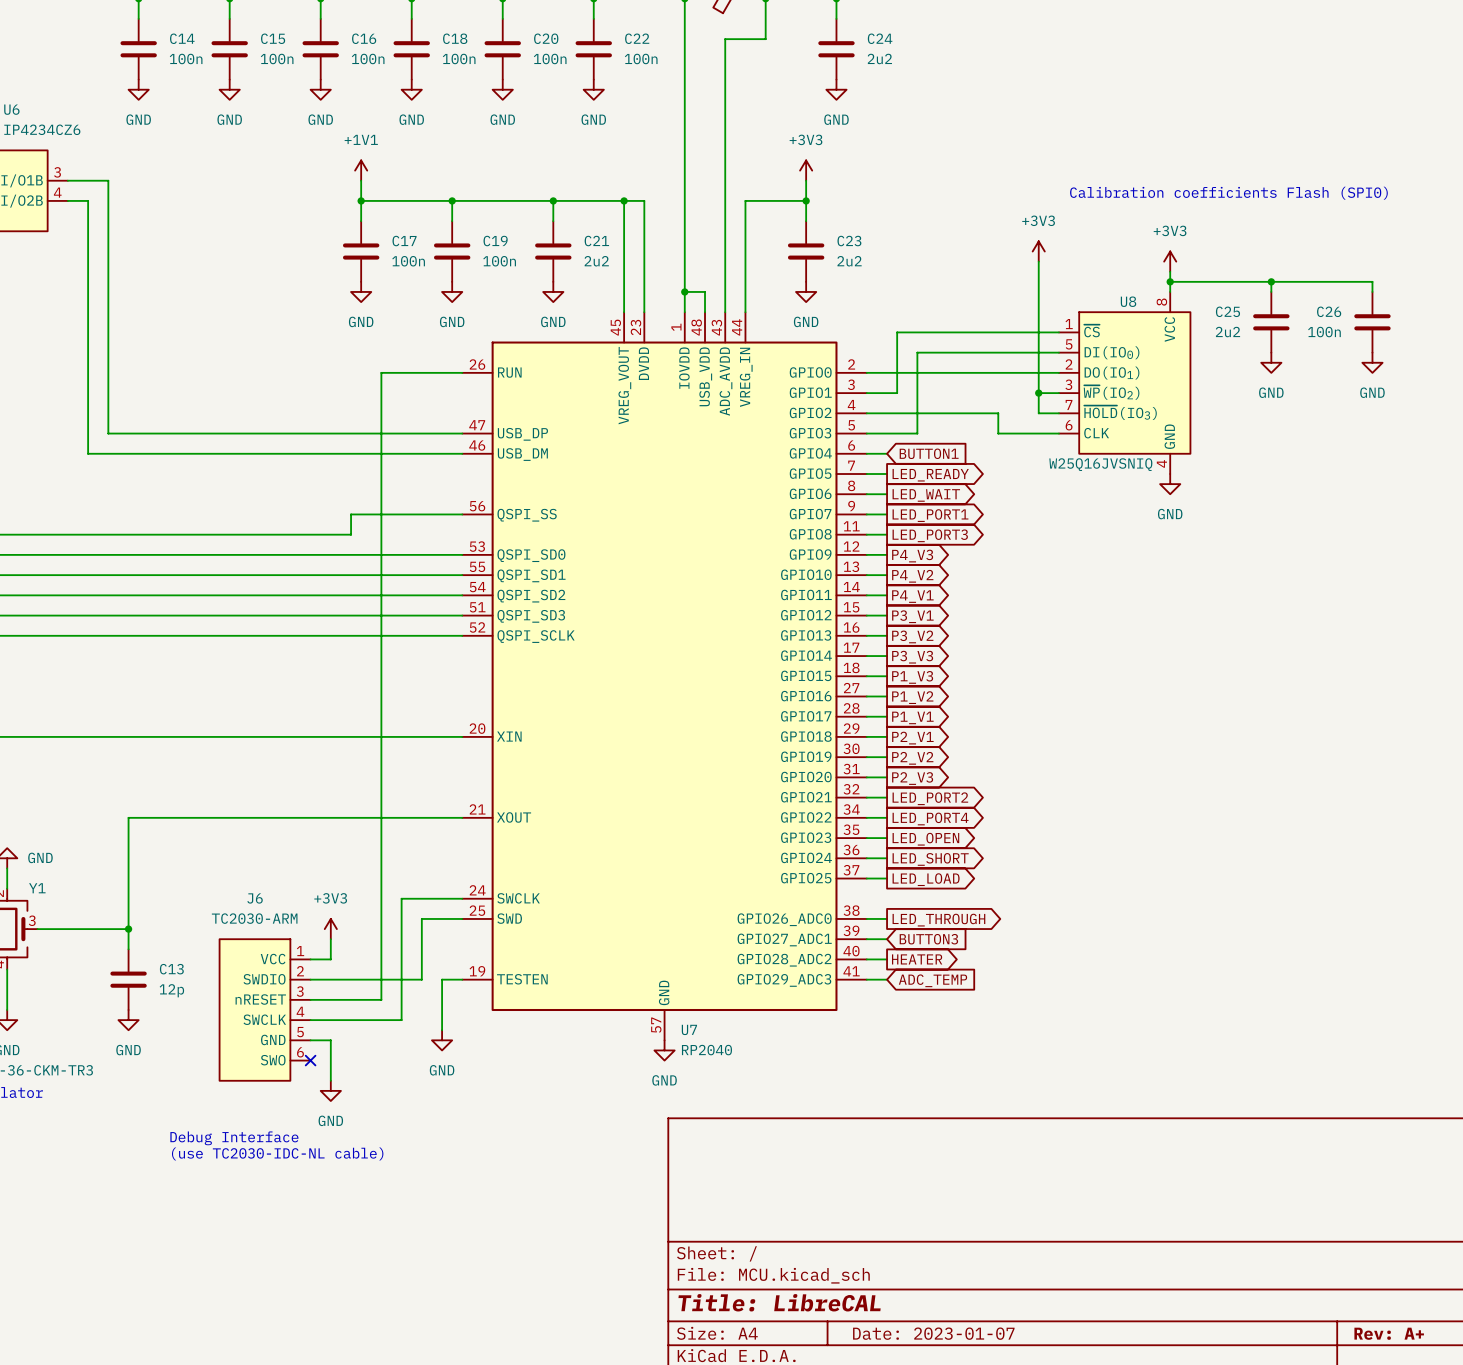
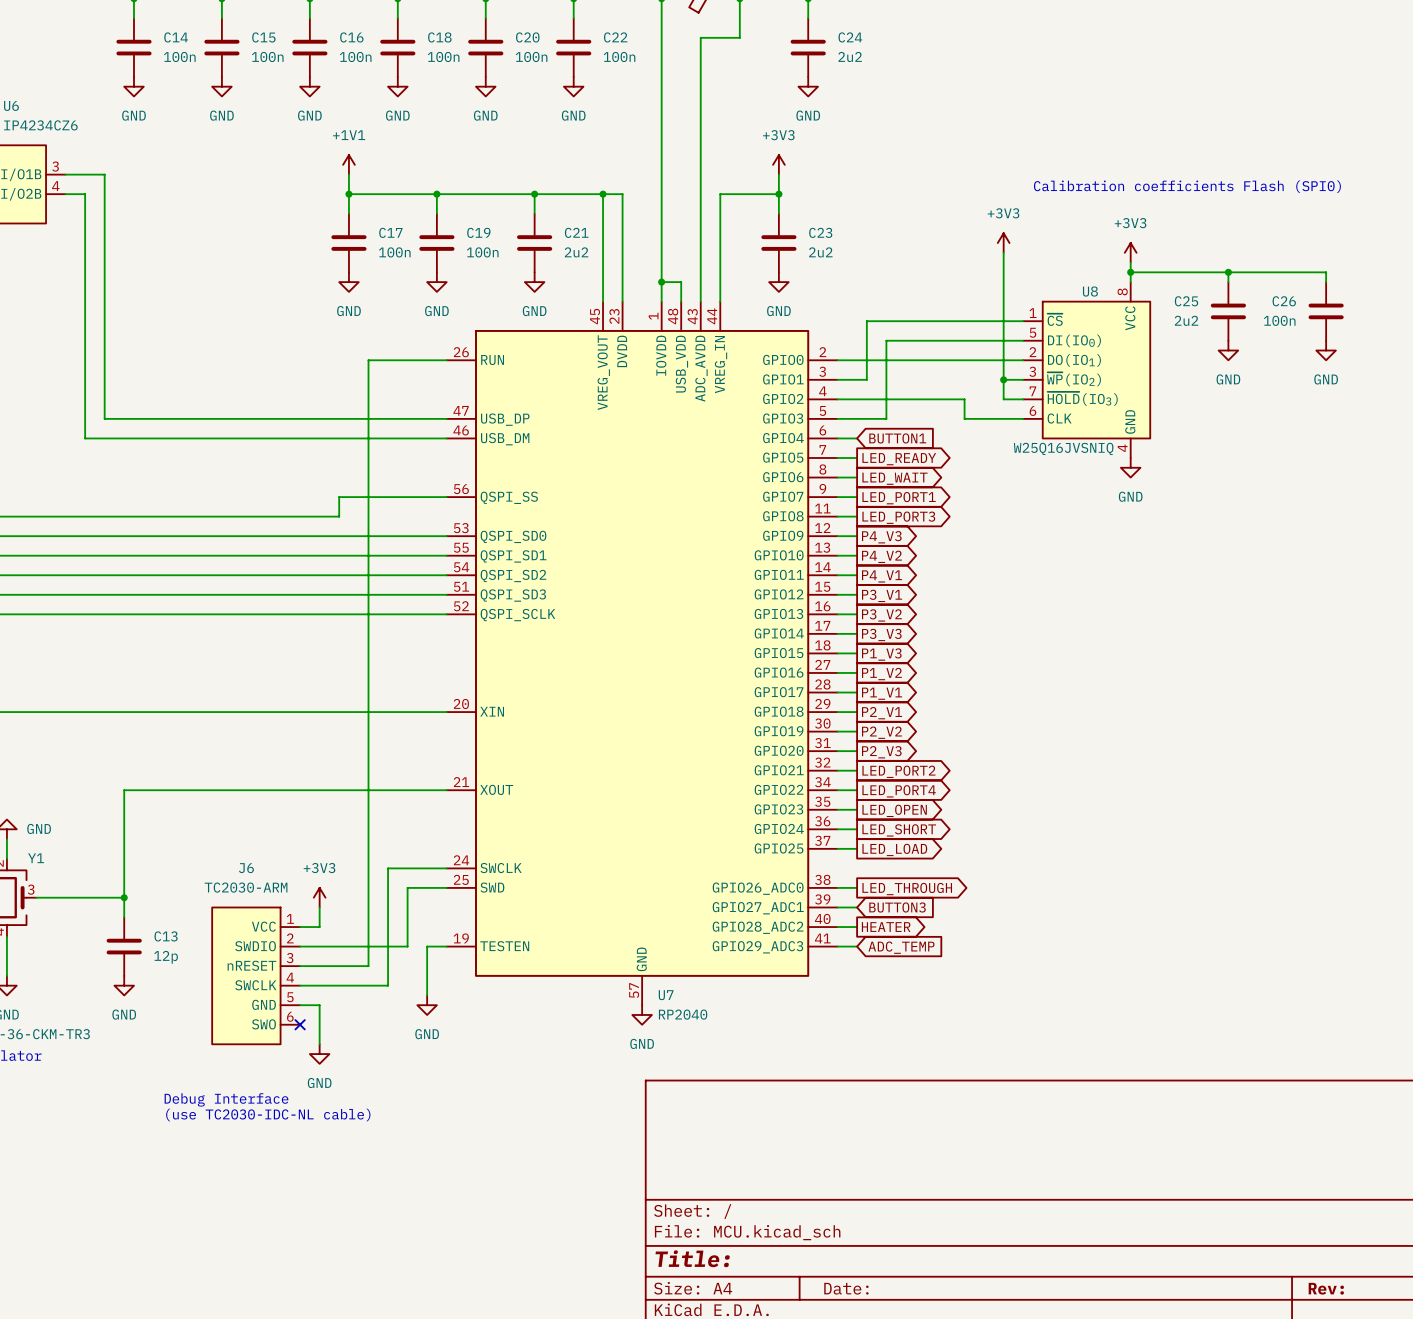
title block: Title: LibreCAL (779, 1302) -> Title: (692, 1258)
title block: Date: 2023-01-07 (933, 1333) -> Date: (846, 1288)
title block: Rev: A+ (1389, 1333) -> Rev: (1326, 1288)

